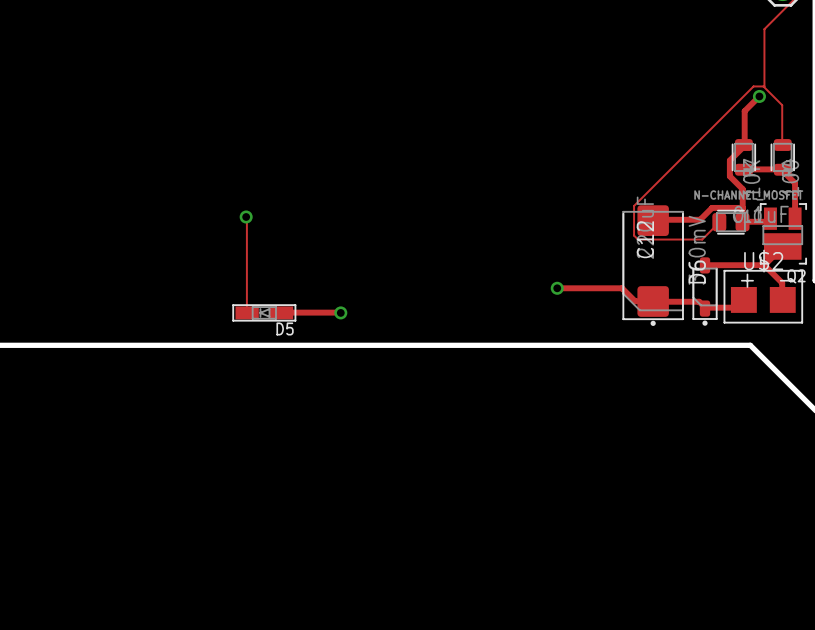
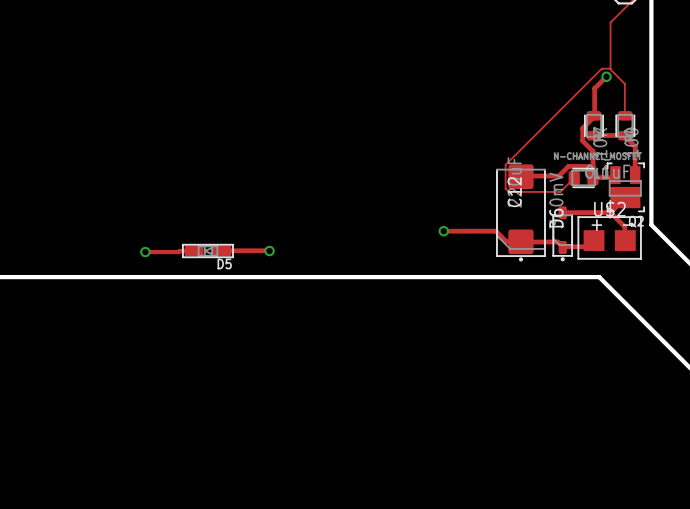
track: (246, 217) (247, 312) -> (145, 252) (194, 251)
via: (246, 217) -> none
via: none -> (145, 252)

